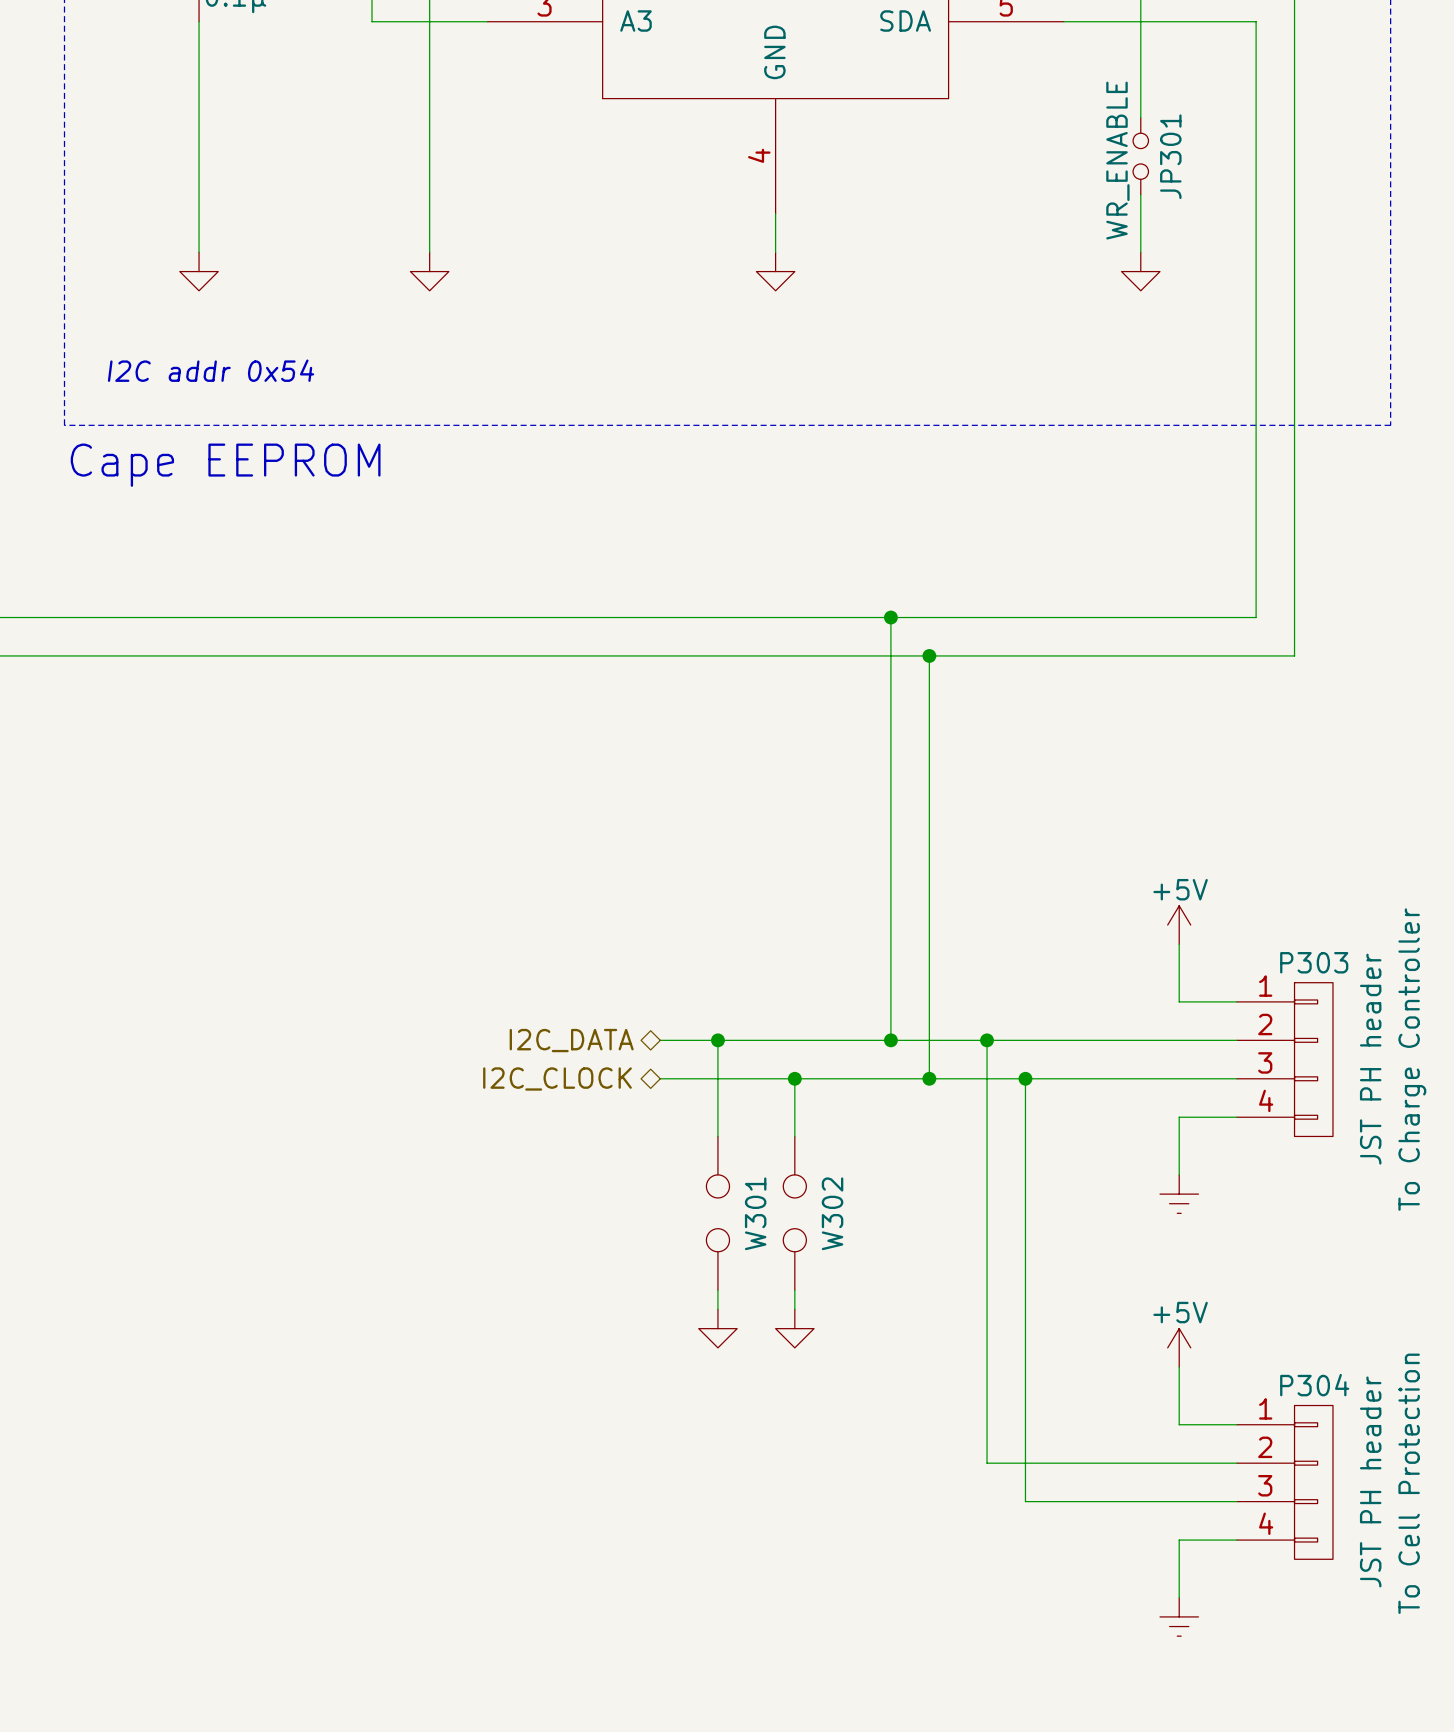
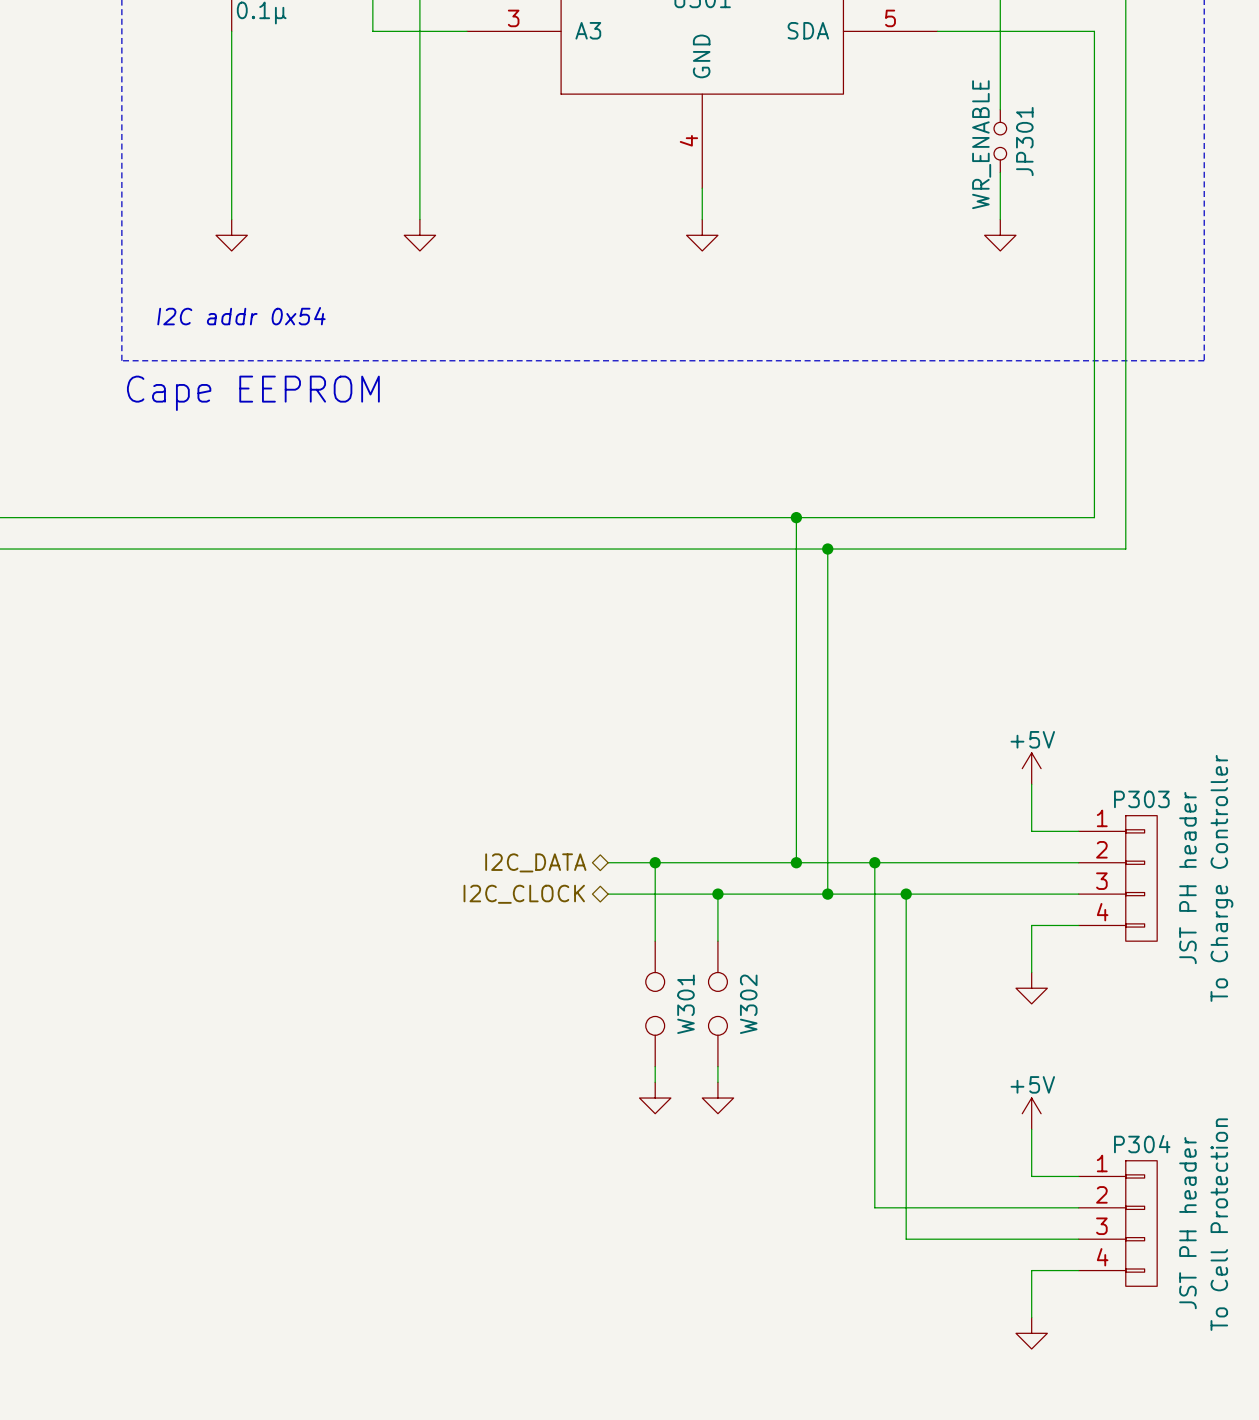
power symbol shape: [1160, 1174, 1199, 1214] -> [1015, 972, 1048, 1004]
power symbol shape: [1160, 1597, 1199, 1637] -> [1015, 1317, 1048, 1350]

